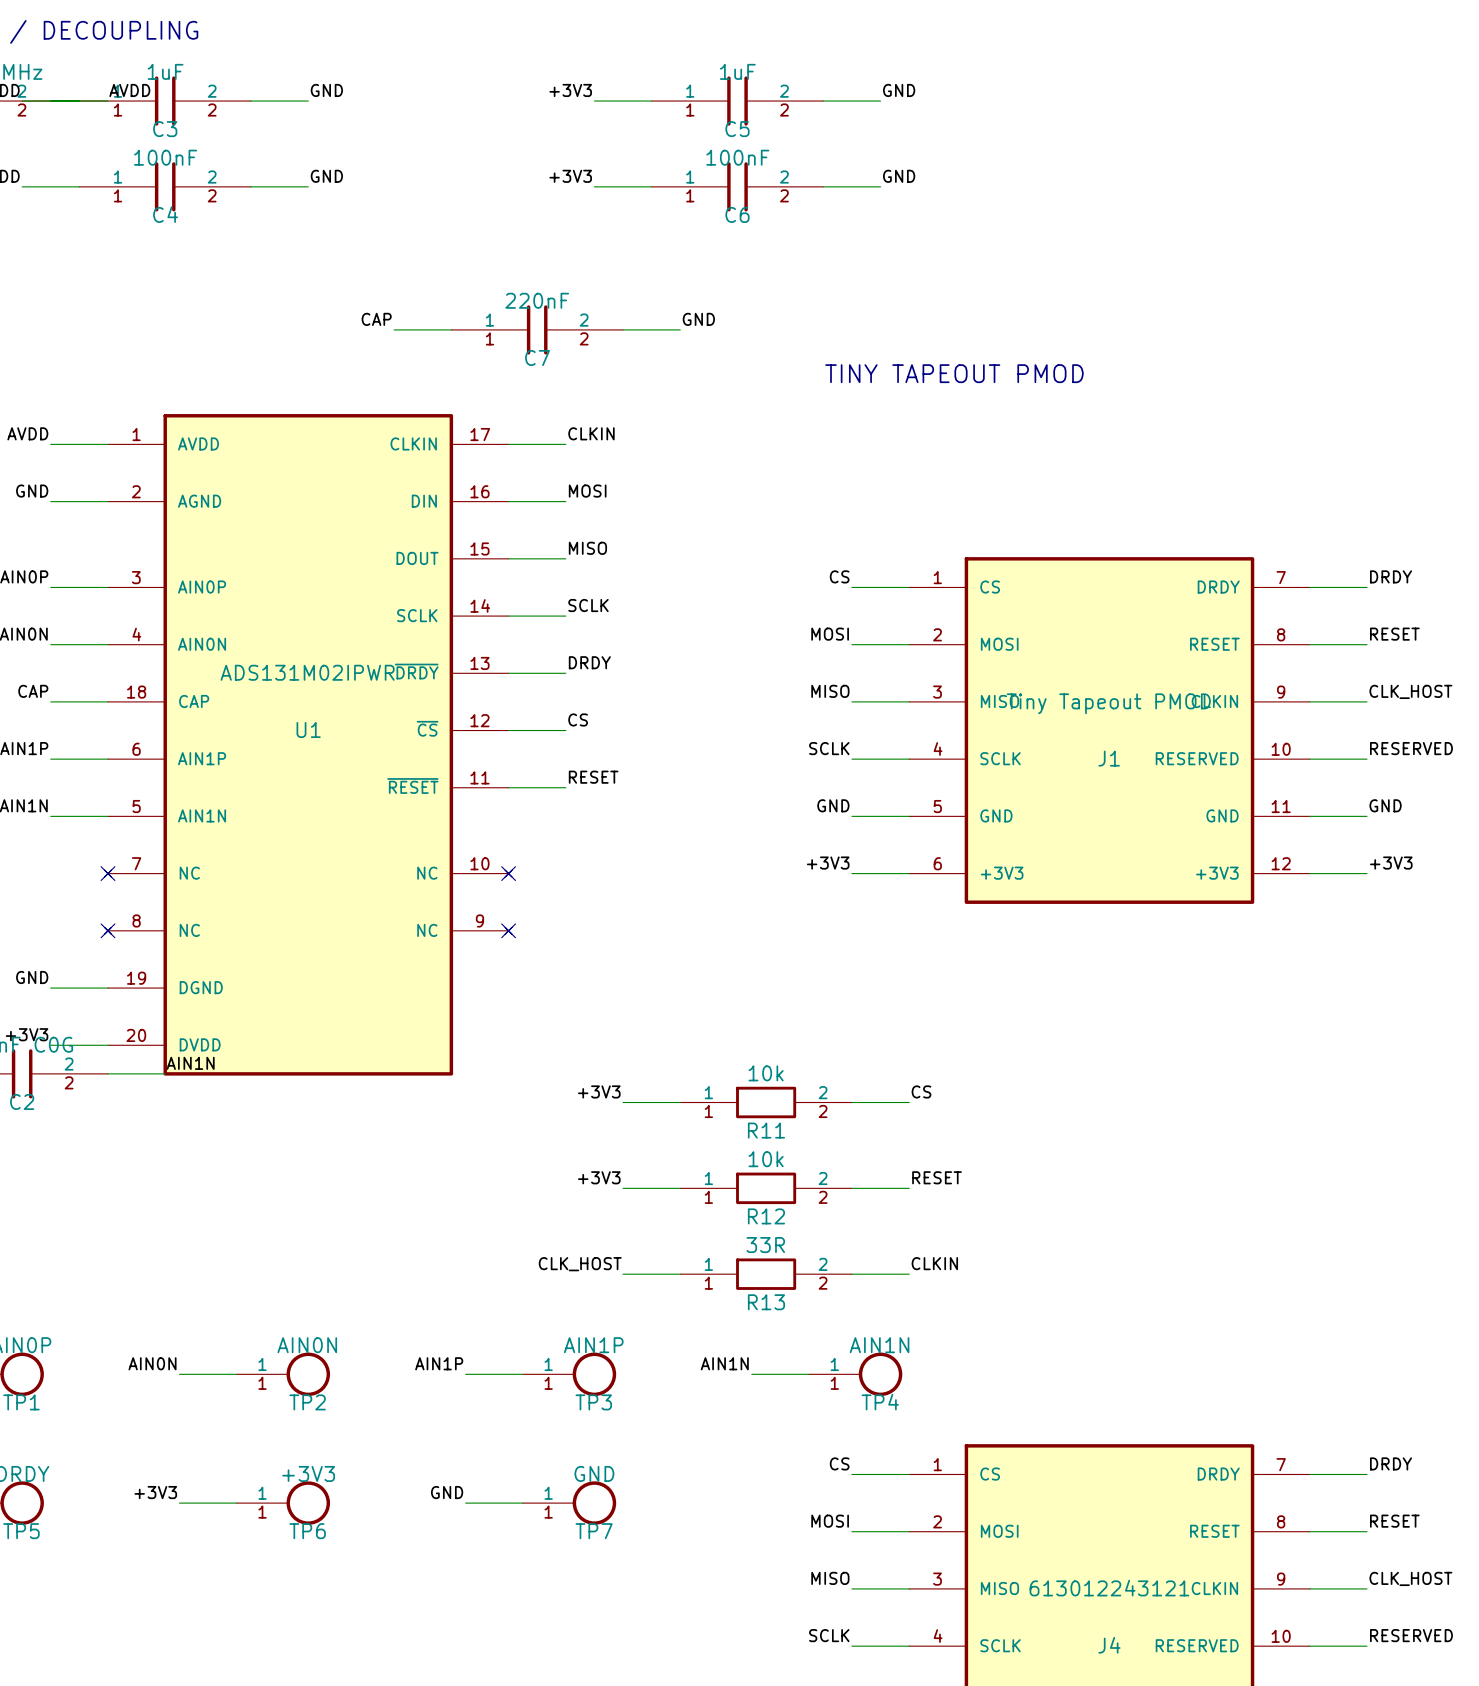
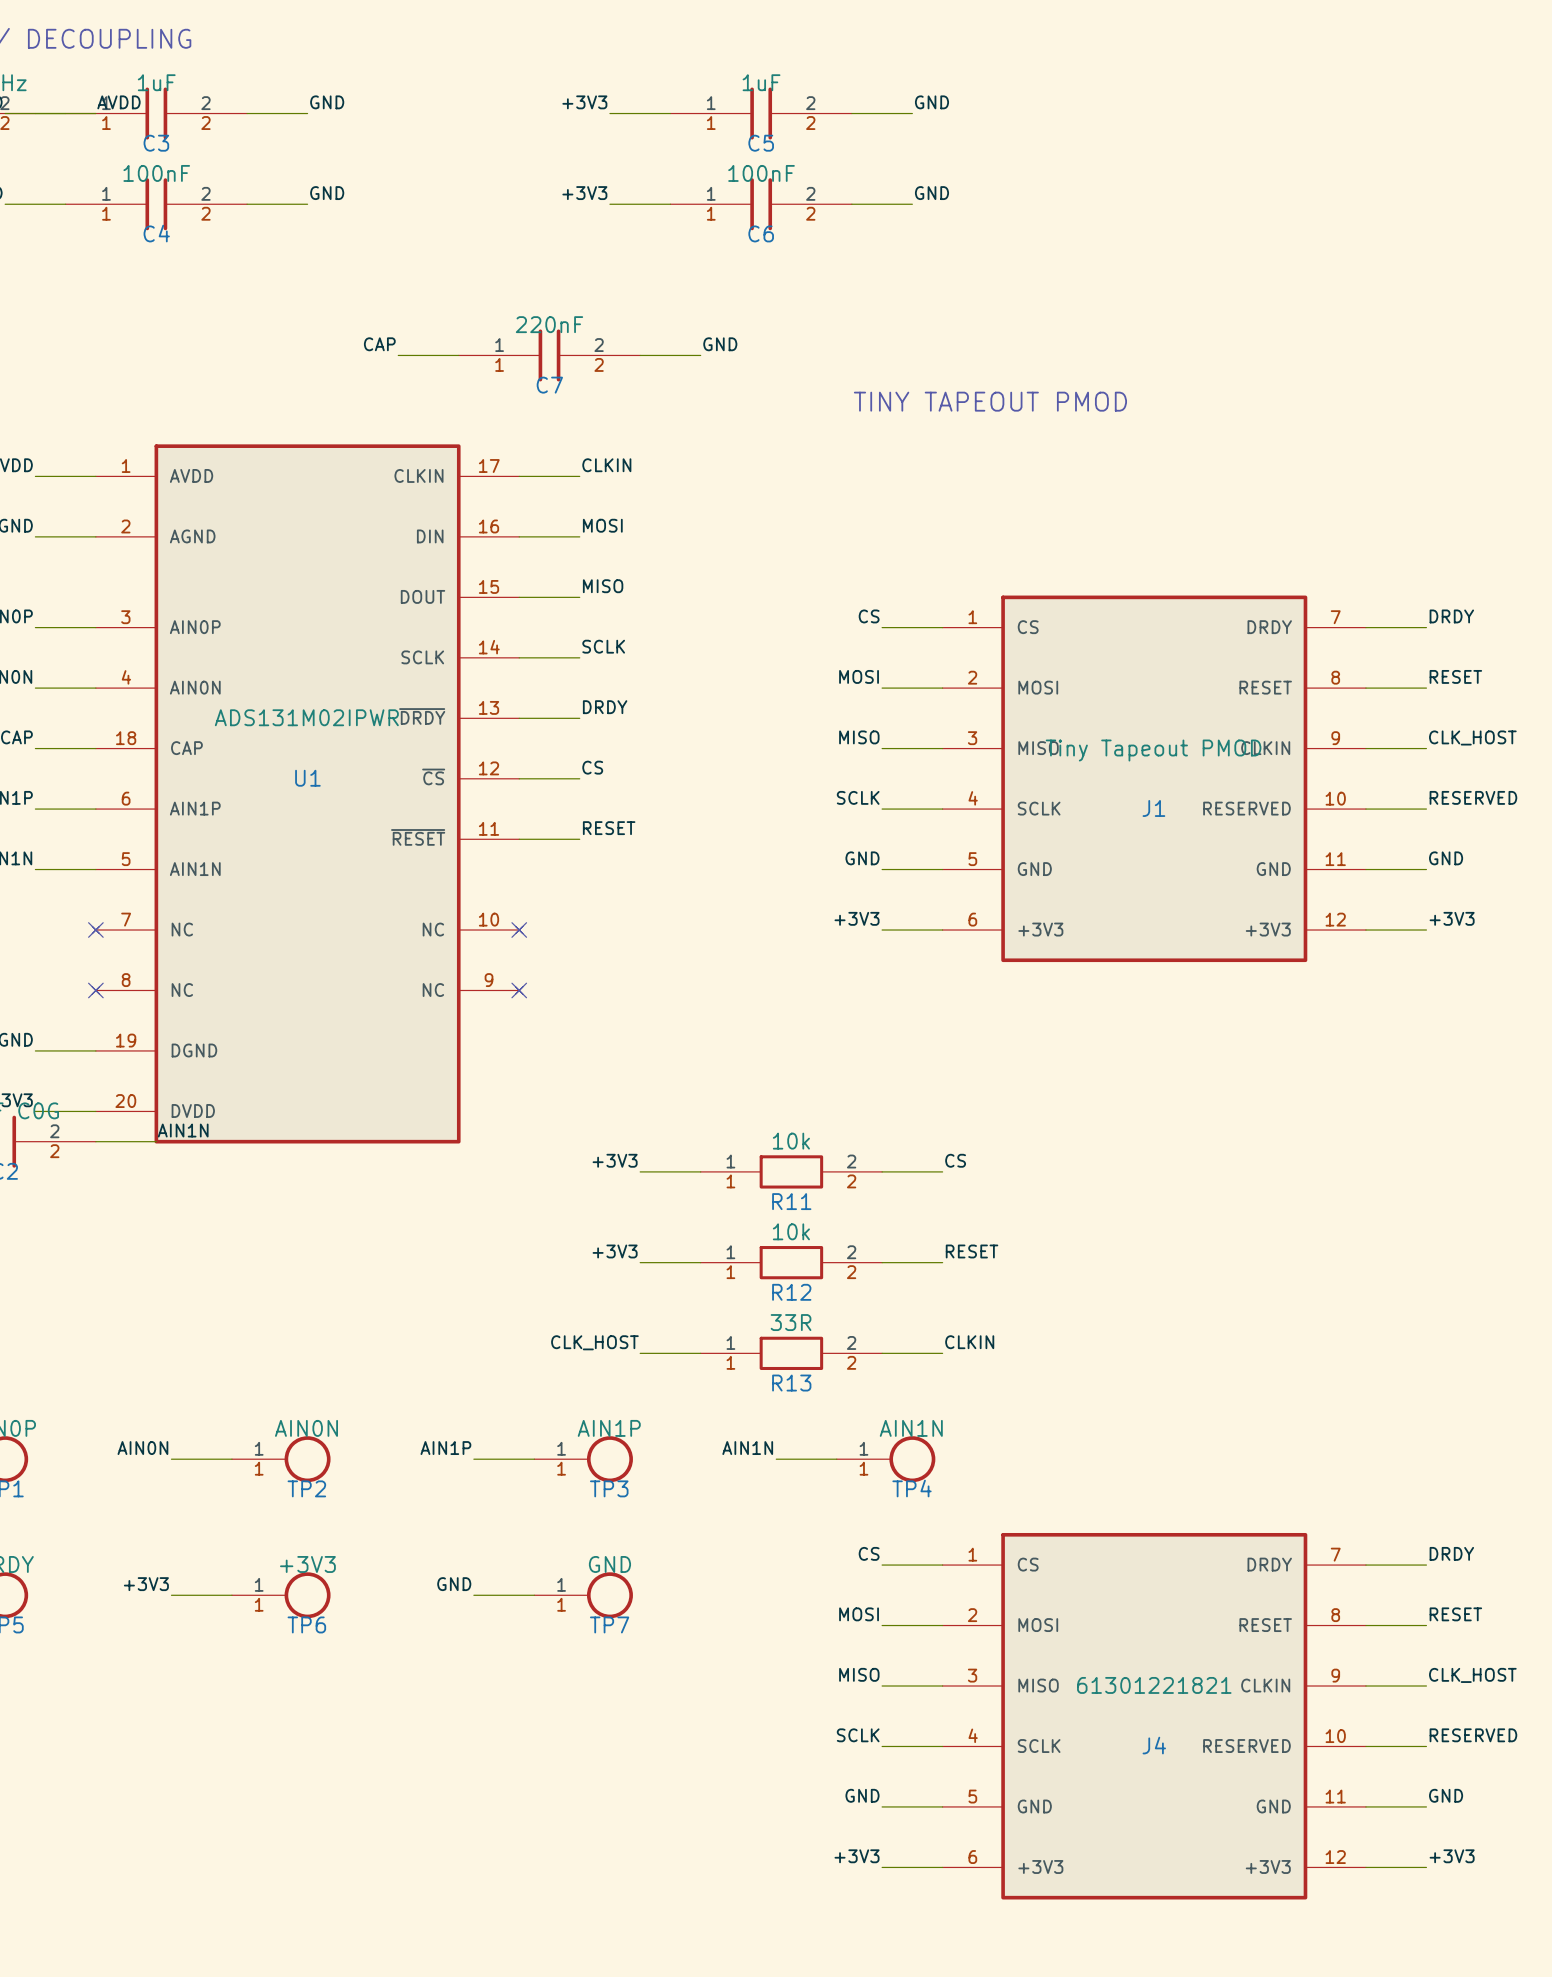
J4 value: 613012243121 (1109, 1588) -> 61301221821 (1154, 1685)

